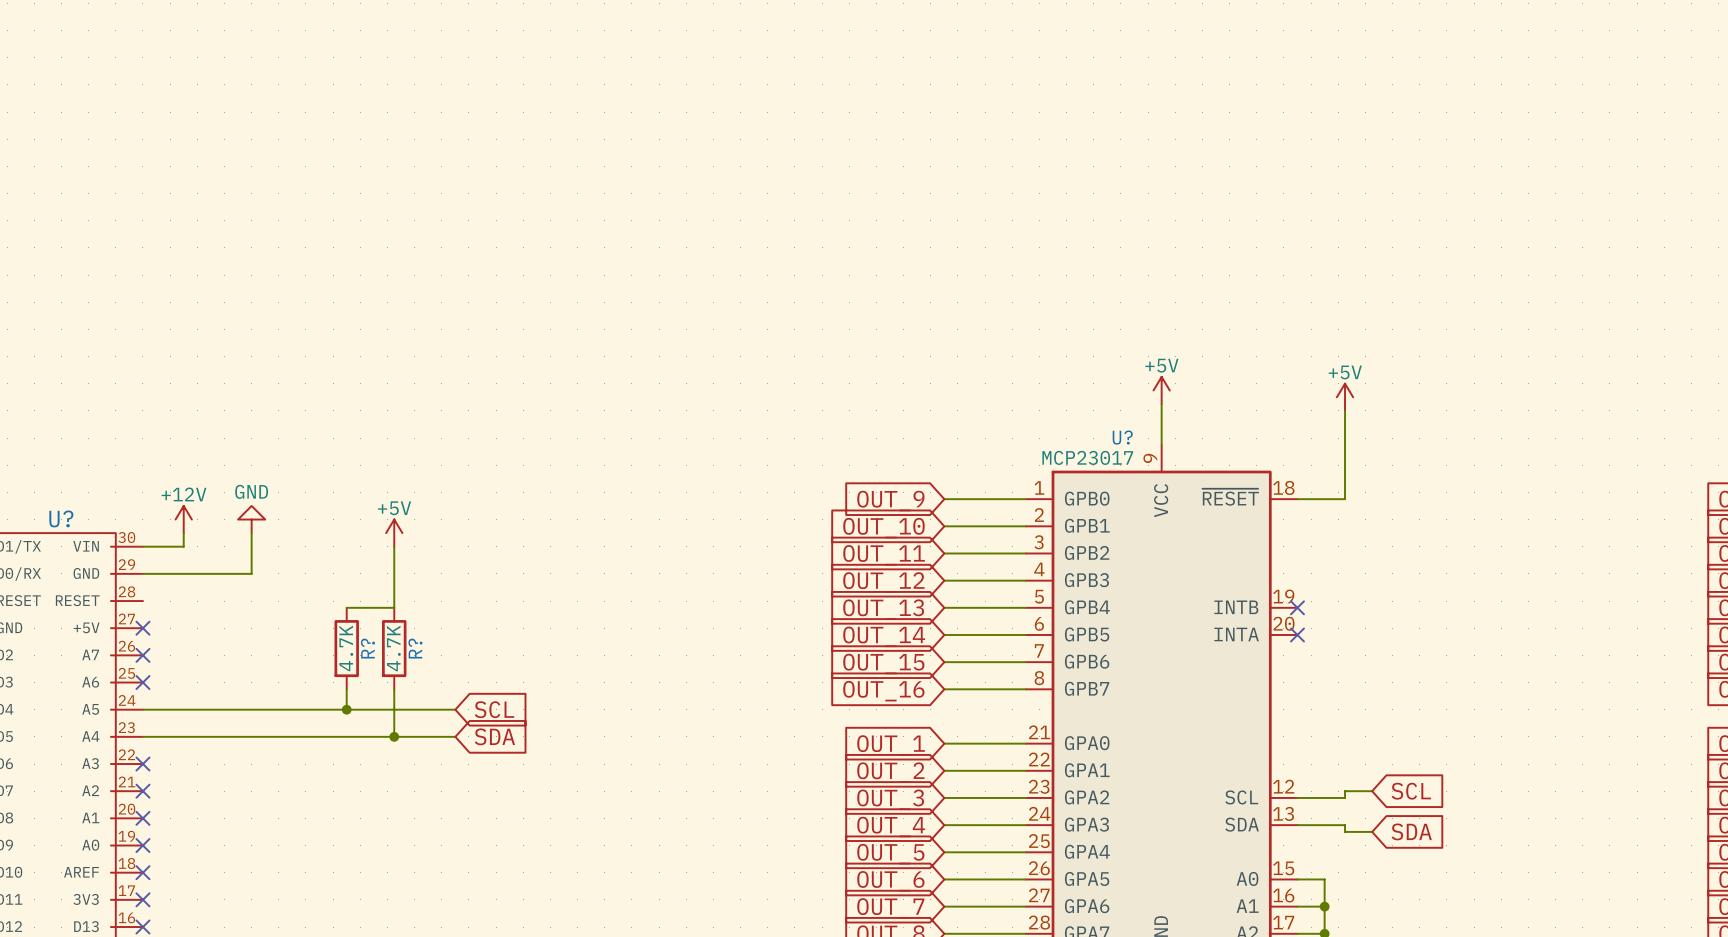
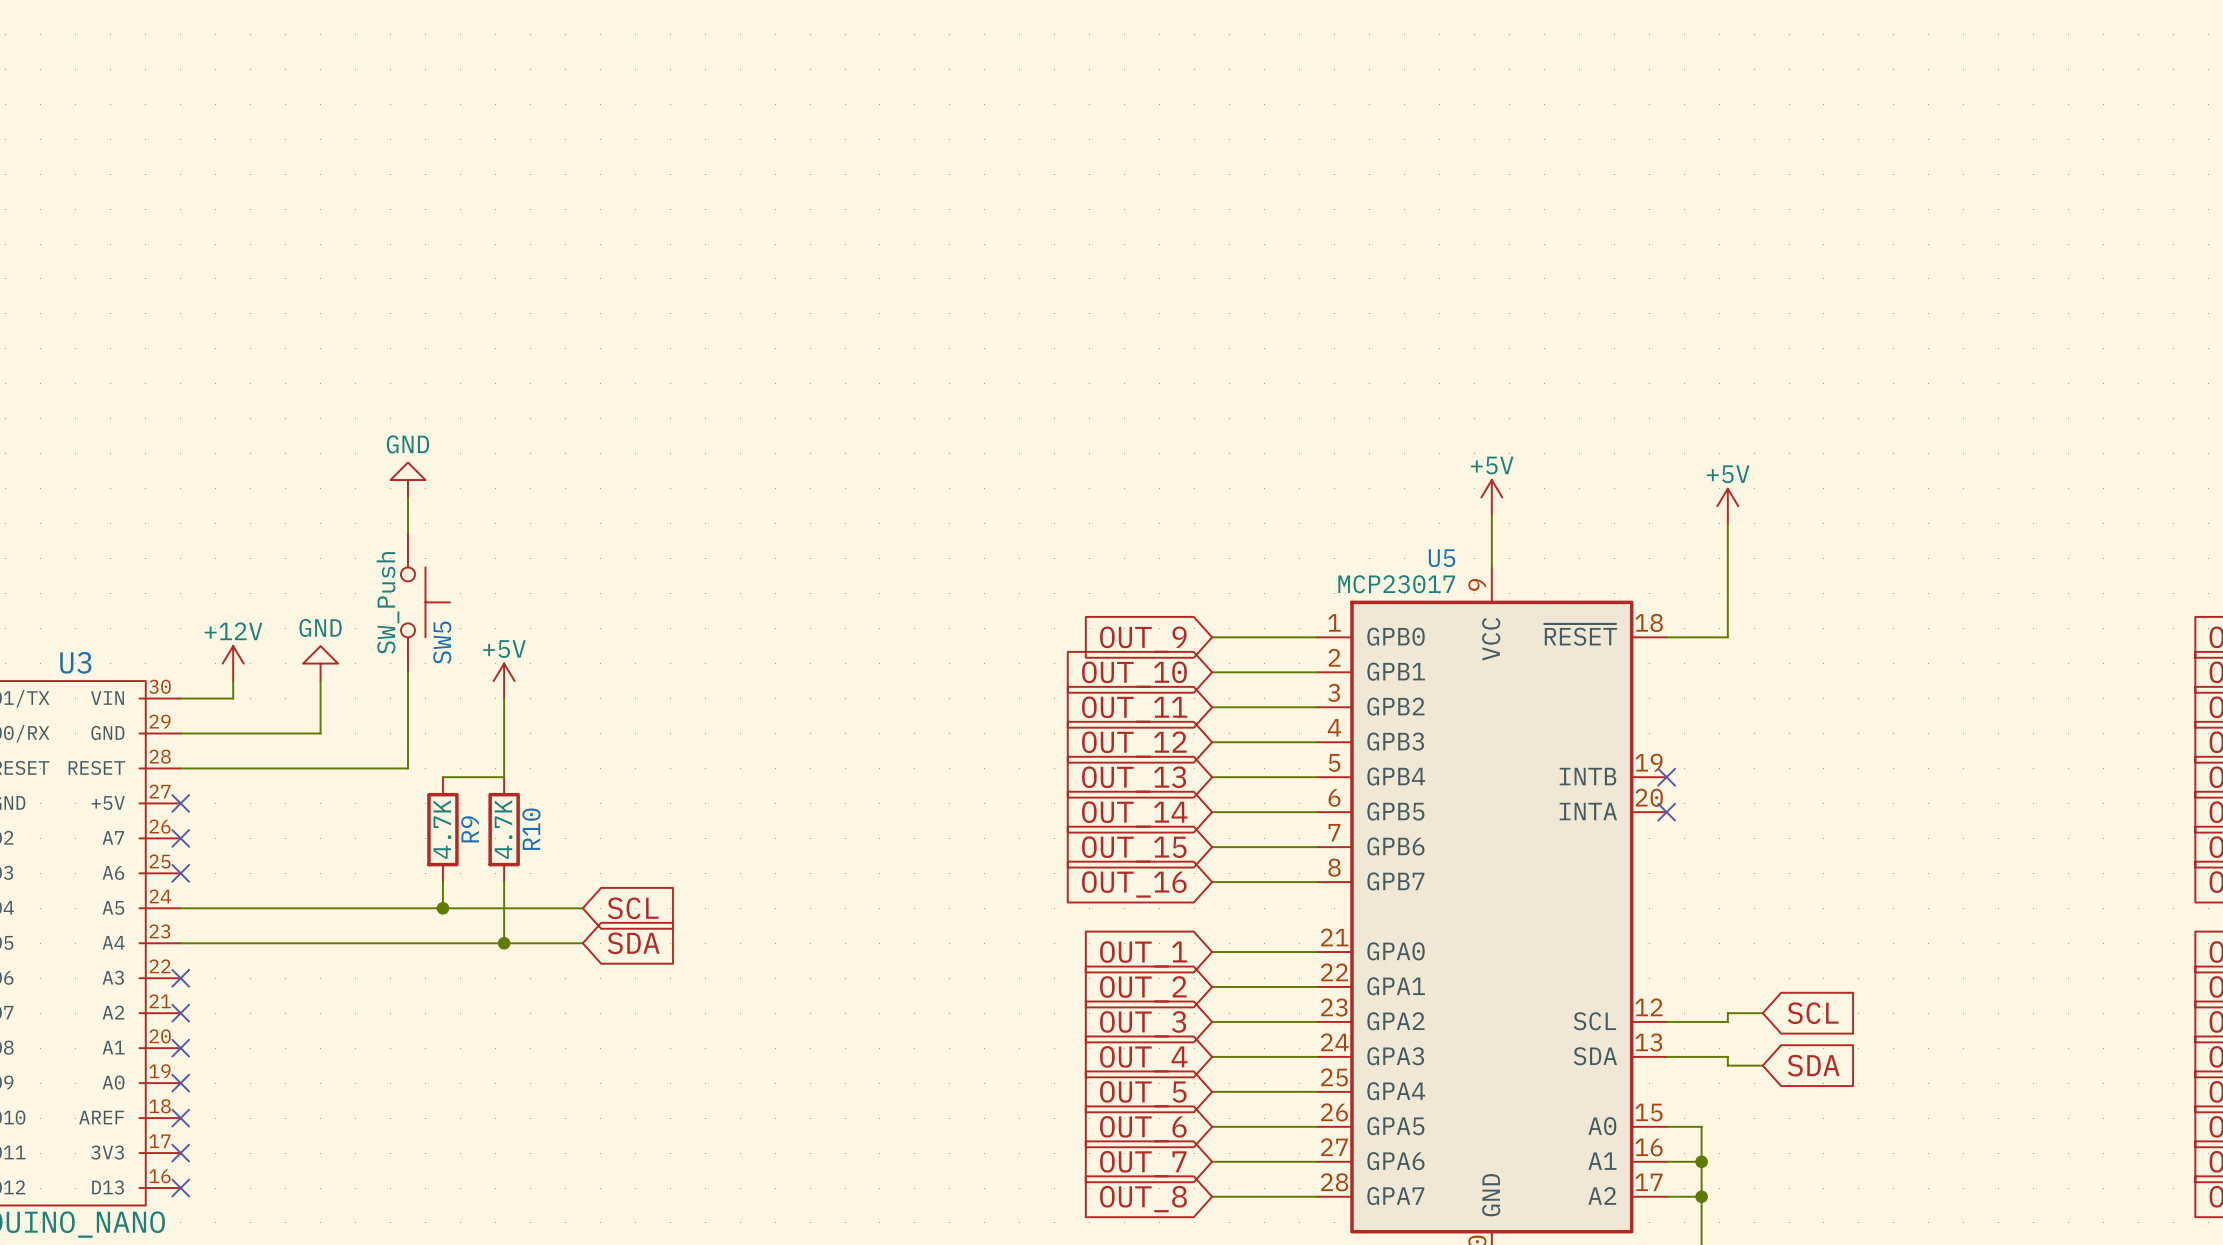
power symbol: none -> GND (407, 480)
wire: none -> (407, 497) (407, 532)
U? name: U? (1122, 437) -> U5 (1442, 558)
SW5: none -> SW_Push (425, 602)
U? name: U? (61, 518) -> U3 (75, 662)
wire: none -> (407, 672) (407, 768) (180, 768)
R? name: R? (367, 648) -> R9 (470, 829)
R? name: R? (415, 648) -> R10 (531, 829)

